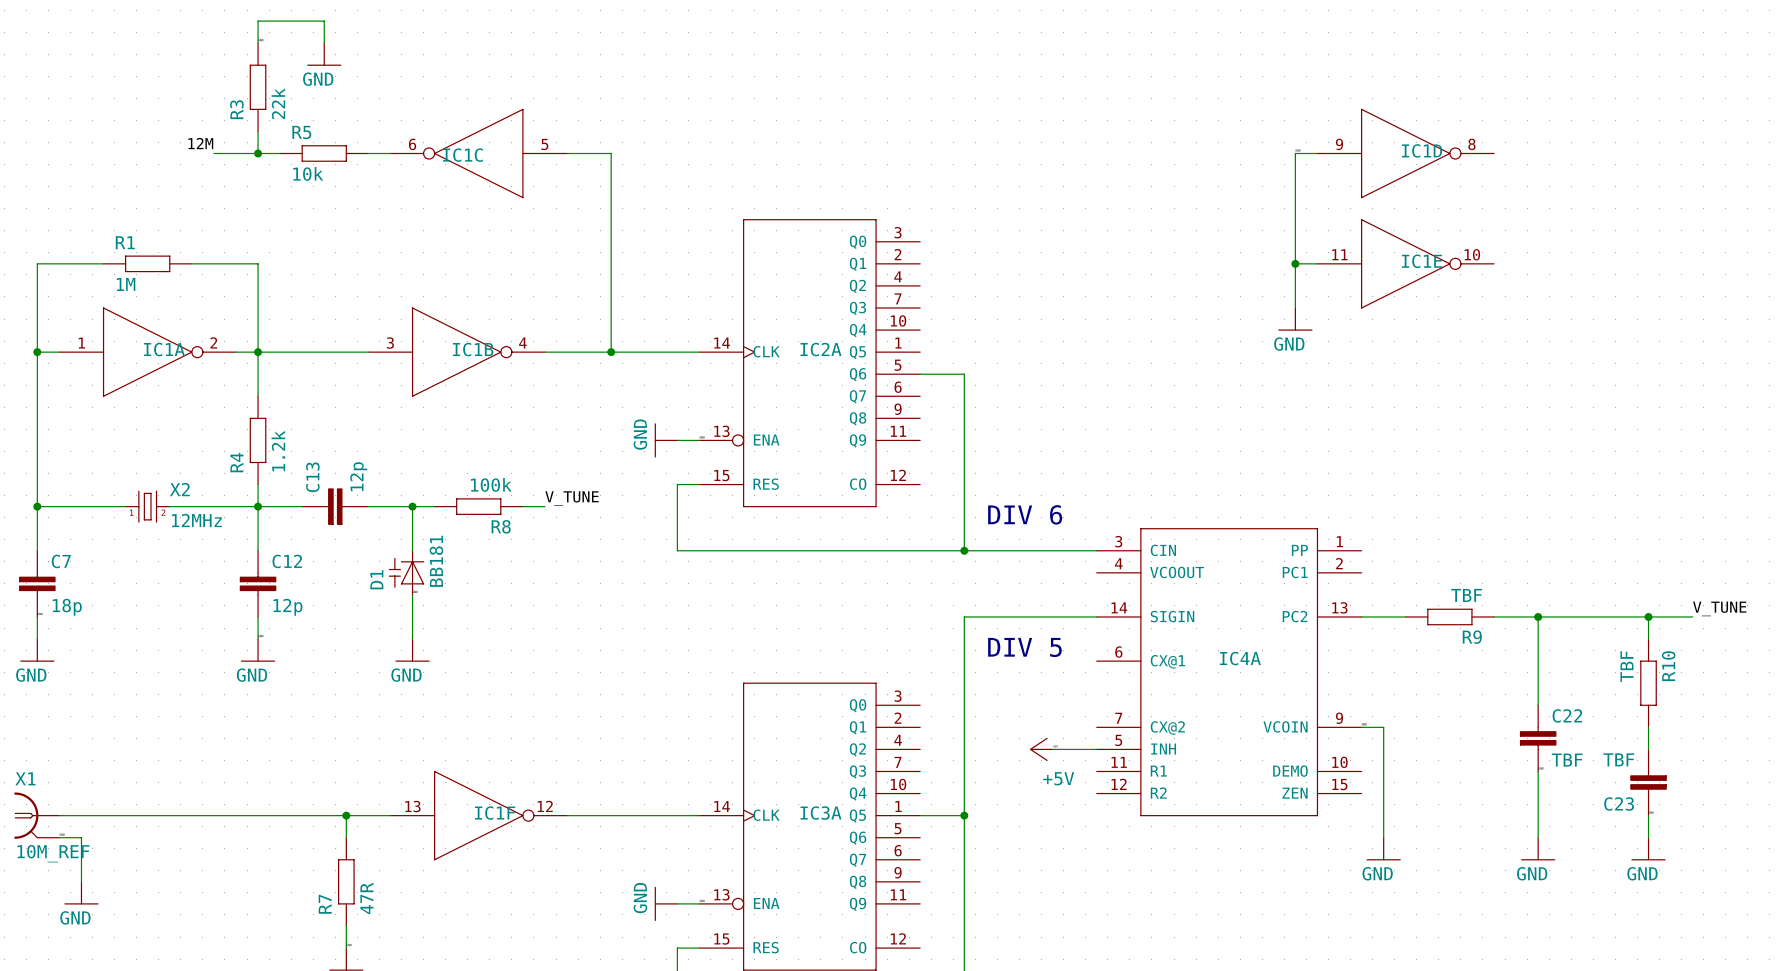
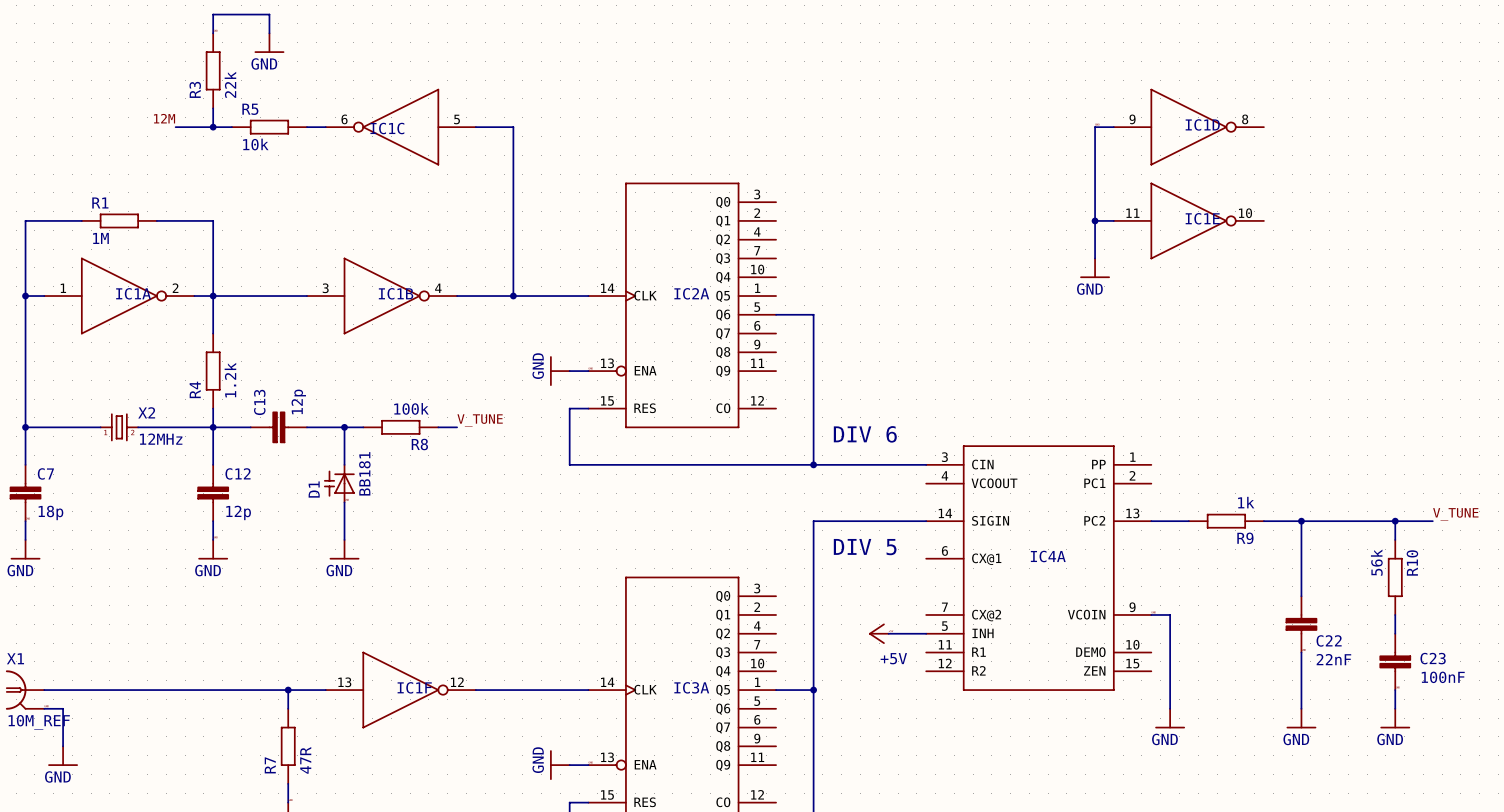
R9 value: TBF (1466, 595) -> 1k (1246, 502)
R10 value: TBF (1626, 666) -> 56k (1376, 562)
C22 name position: C22 (1567, 715) -> C22 (1329, 640)
C23 value: TBF (1618, 759) -> 100nF (1443, 677)
C22 value: TBF (1567, 760) -> 22nF (1333, 659)
C23 name position: C23 (1619, 804) -> C23 (1433, 658)

